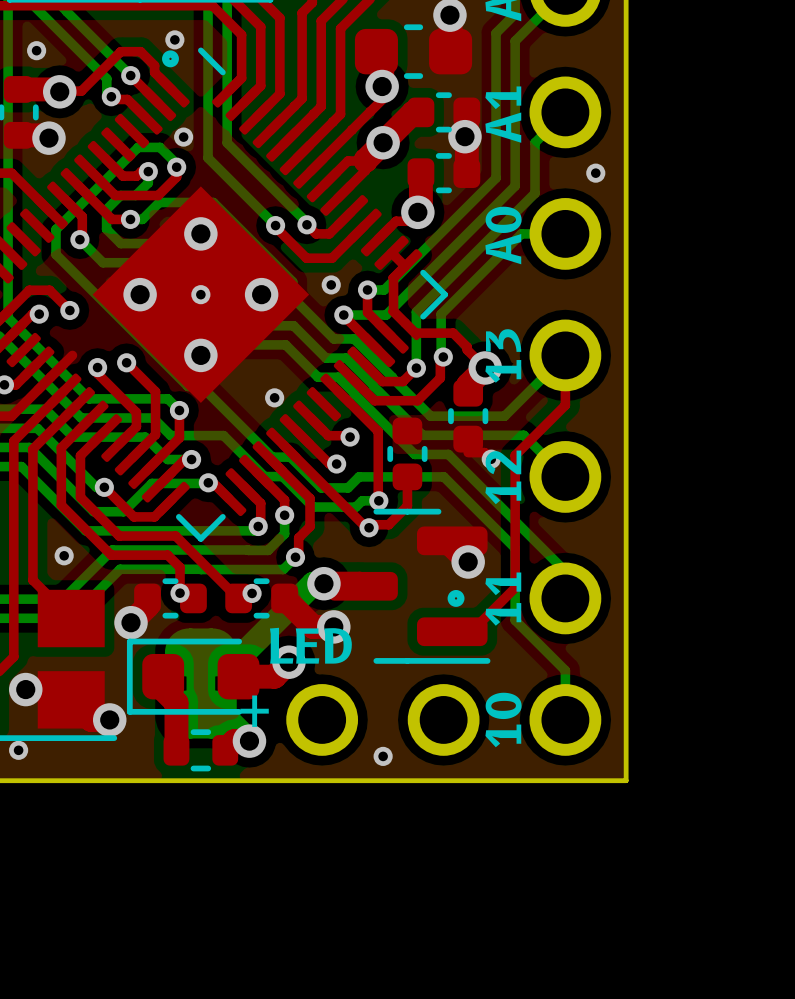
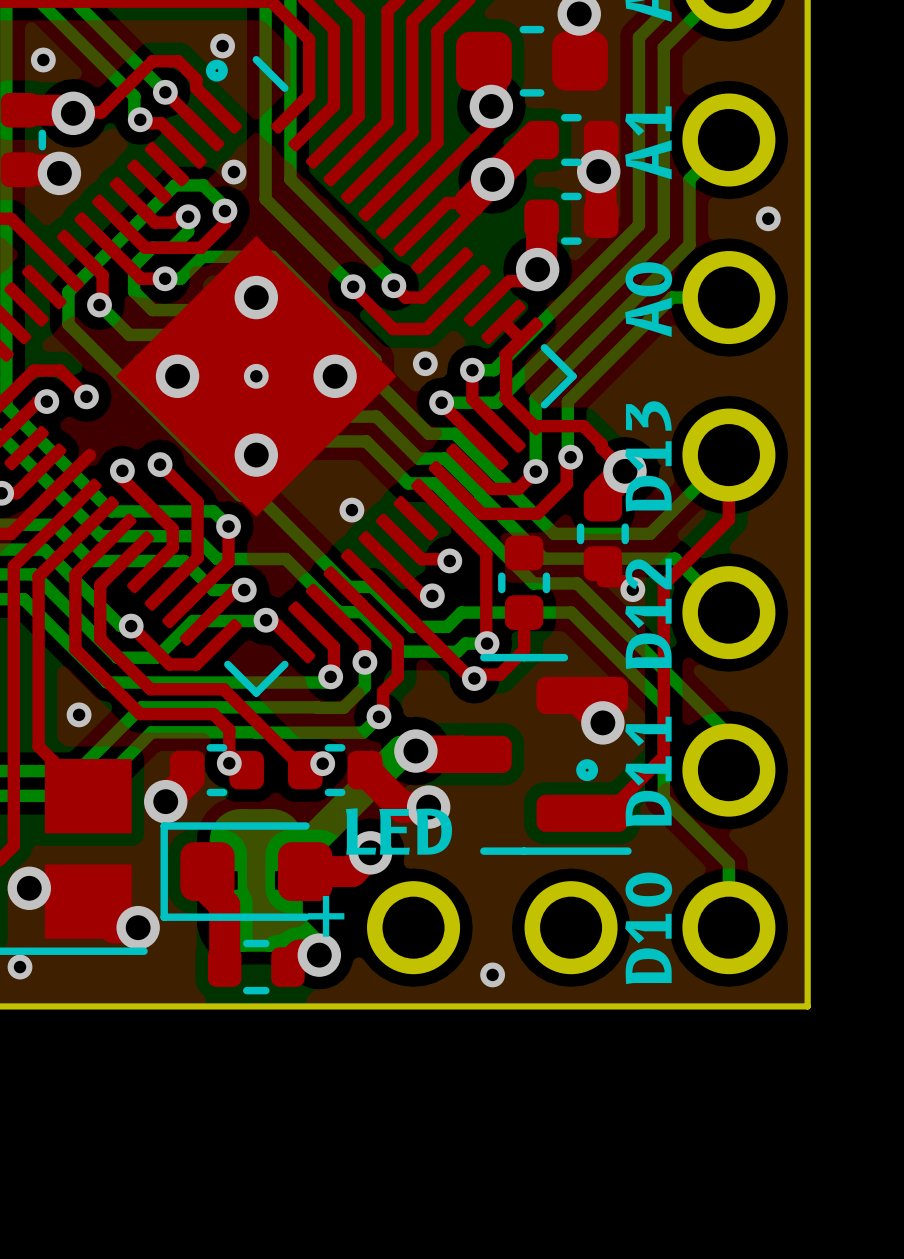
text: 13 (503, 355) -> D13 (648, 456)
text: 12 (503, 477) -> D12 (648, 613)
text: 11 (503, 599) -> D11 (648, 771)
text: 10 (503, 719) -> D10 (648, 928)

